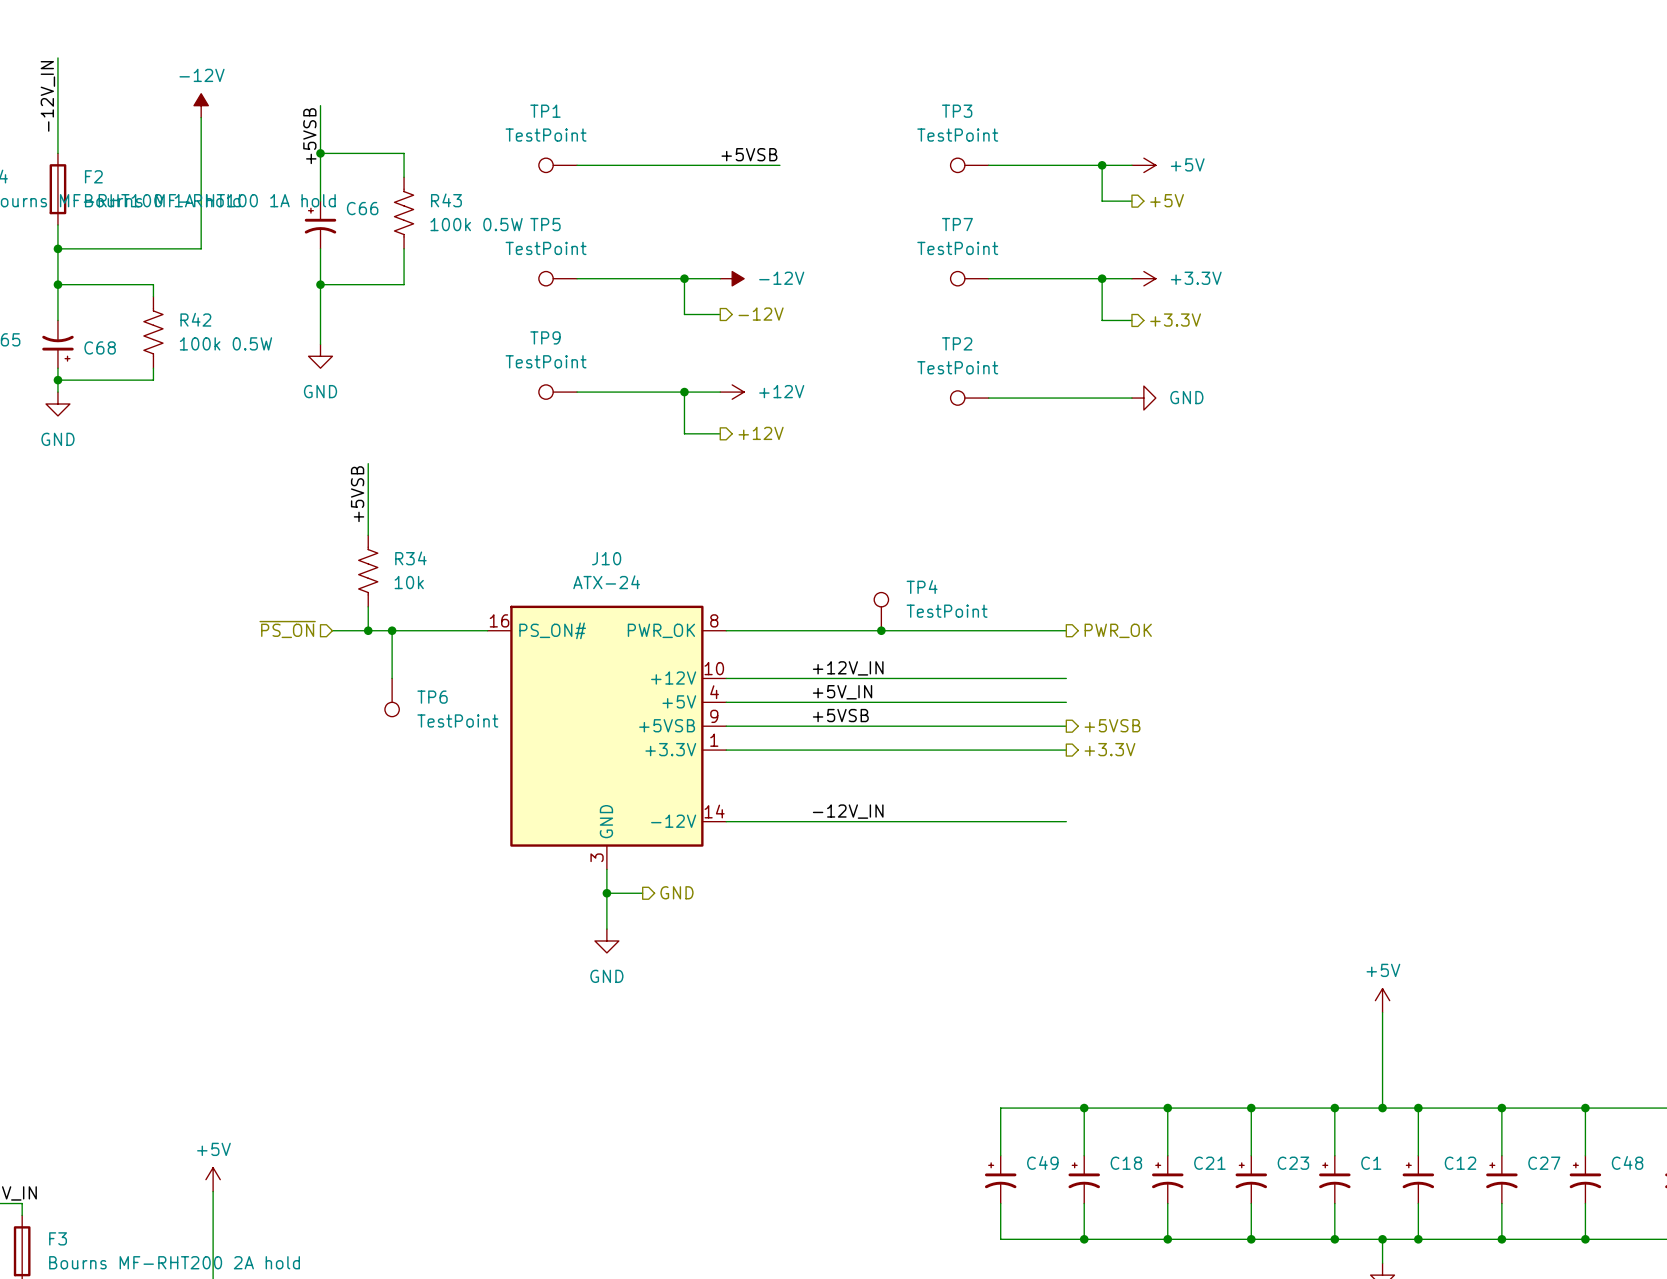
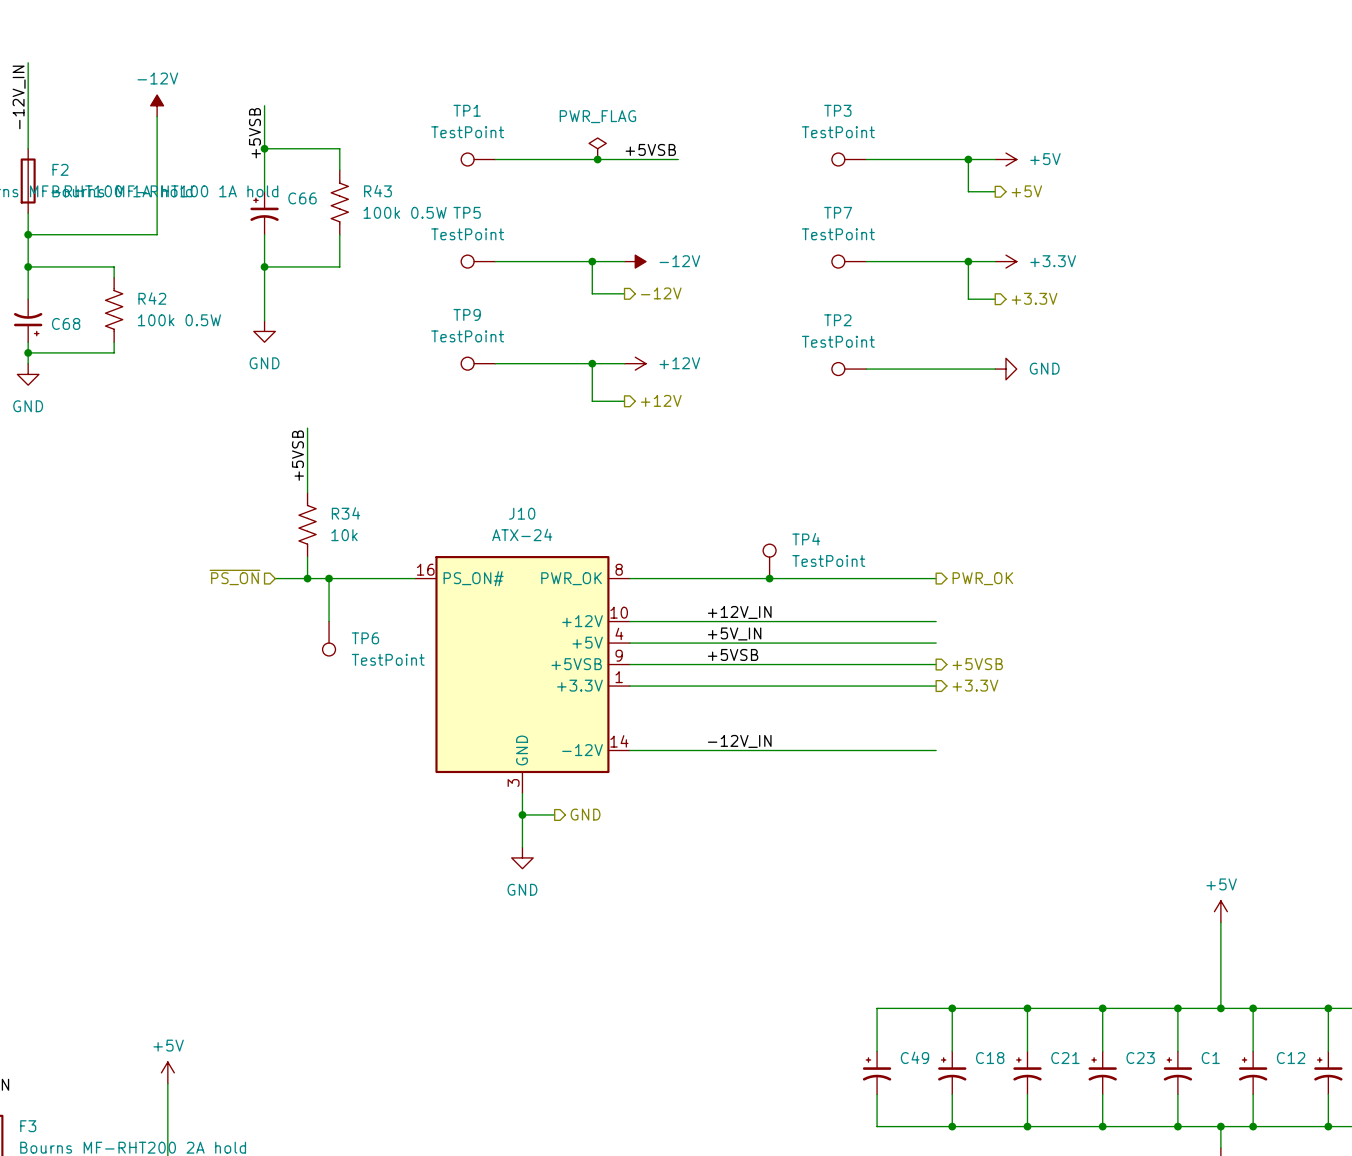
power symbol: none -> PWR_FLAG (597, 148)
junction: none -> (597, 159)

